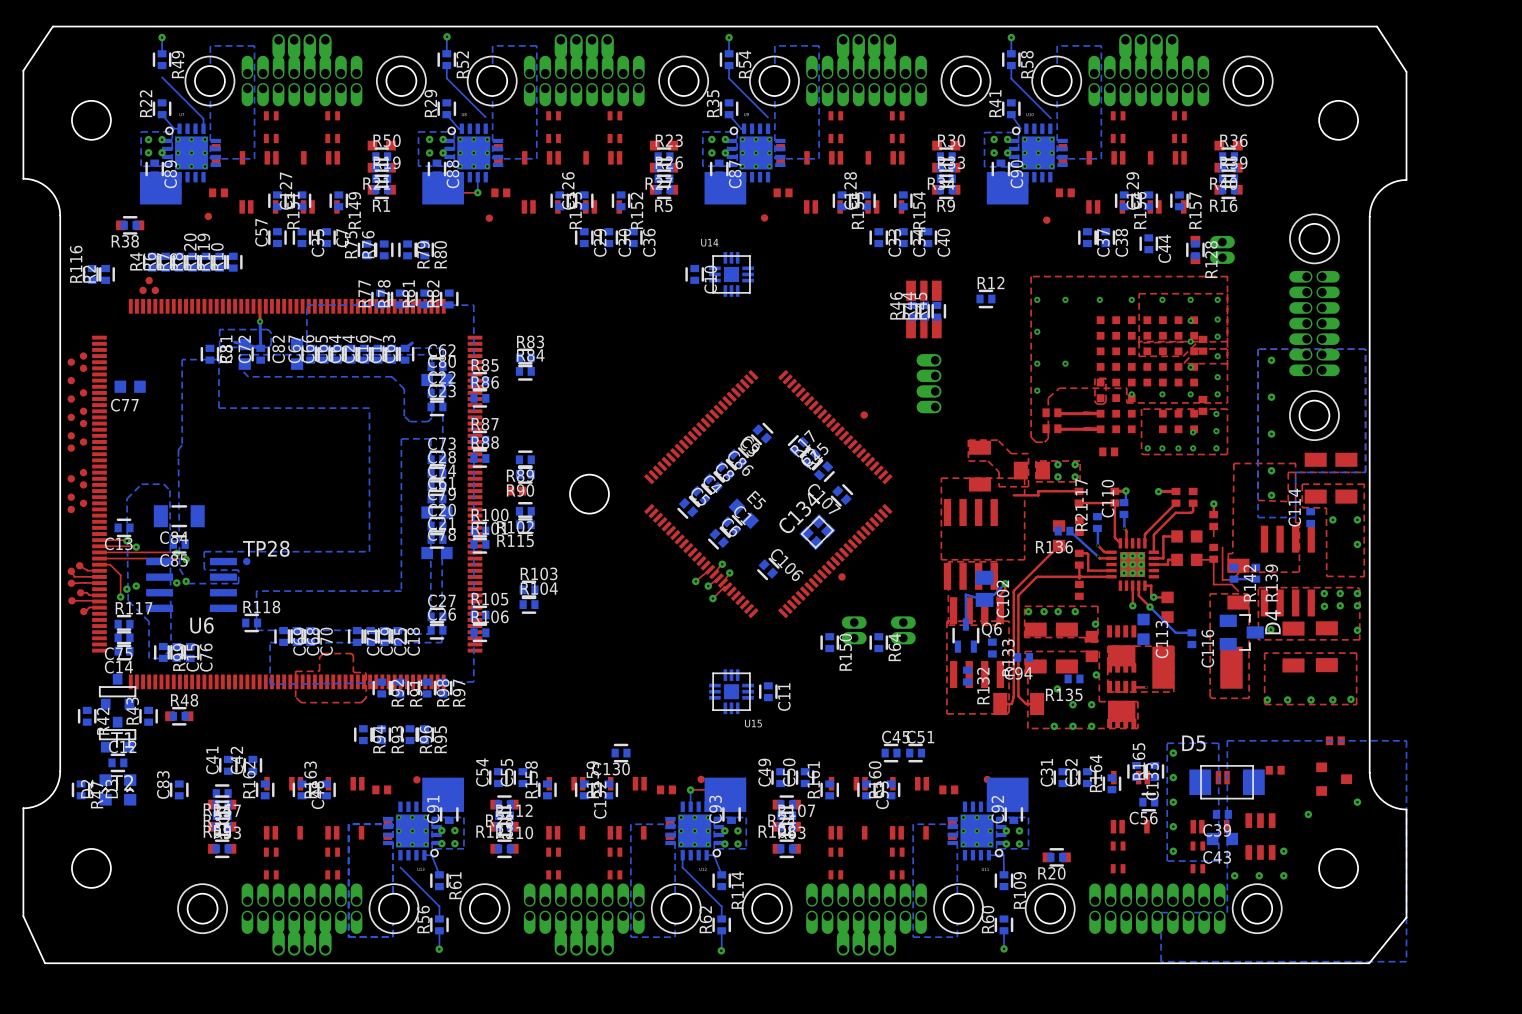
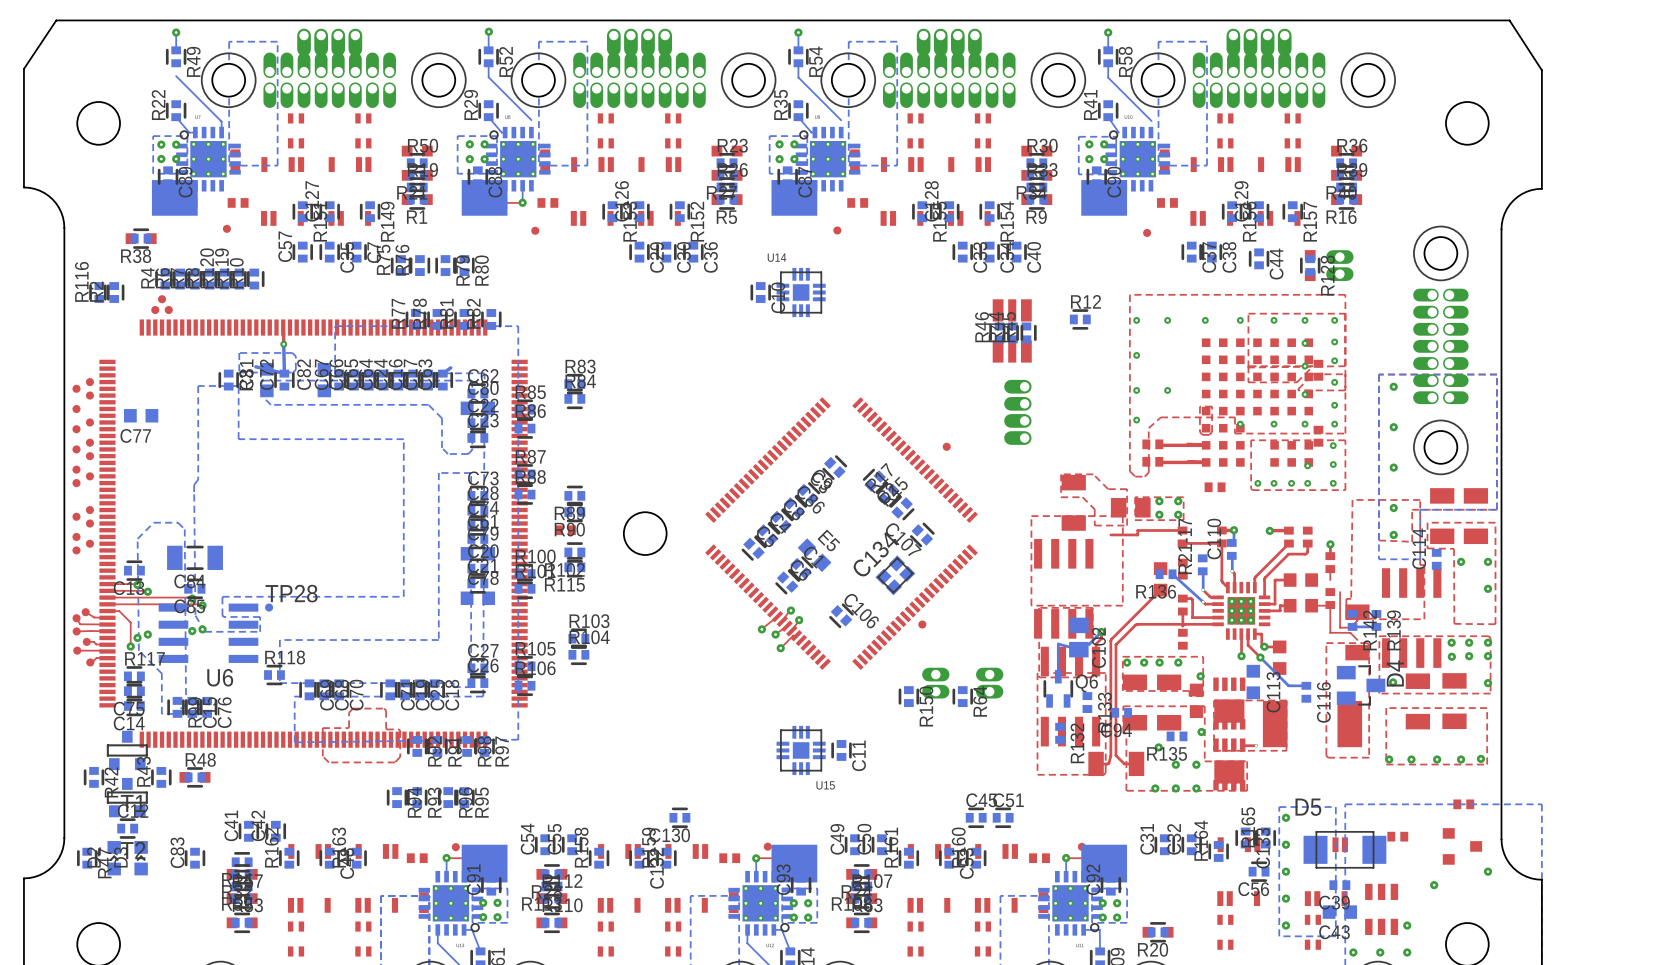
bottom track: none -> (446, 858) (446, 876)
via: none -> (446, 858)
top track: none -> (467, 858) (446, 858)
bottom track: none -> (1066, 858) (1066, 876)
via: none -> (1066, 858)
top track: none -> (1086, 858) (1066, 858)
bottom track: none -> (437, 929) (437, 943)

